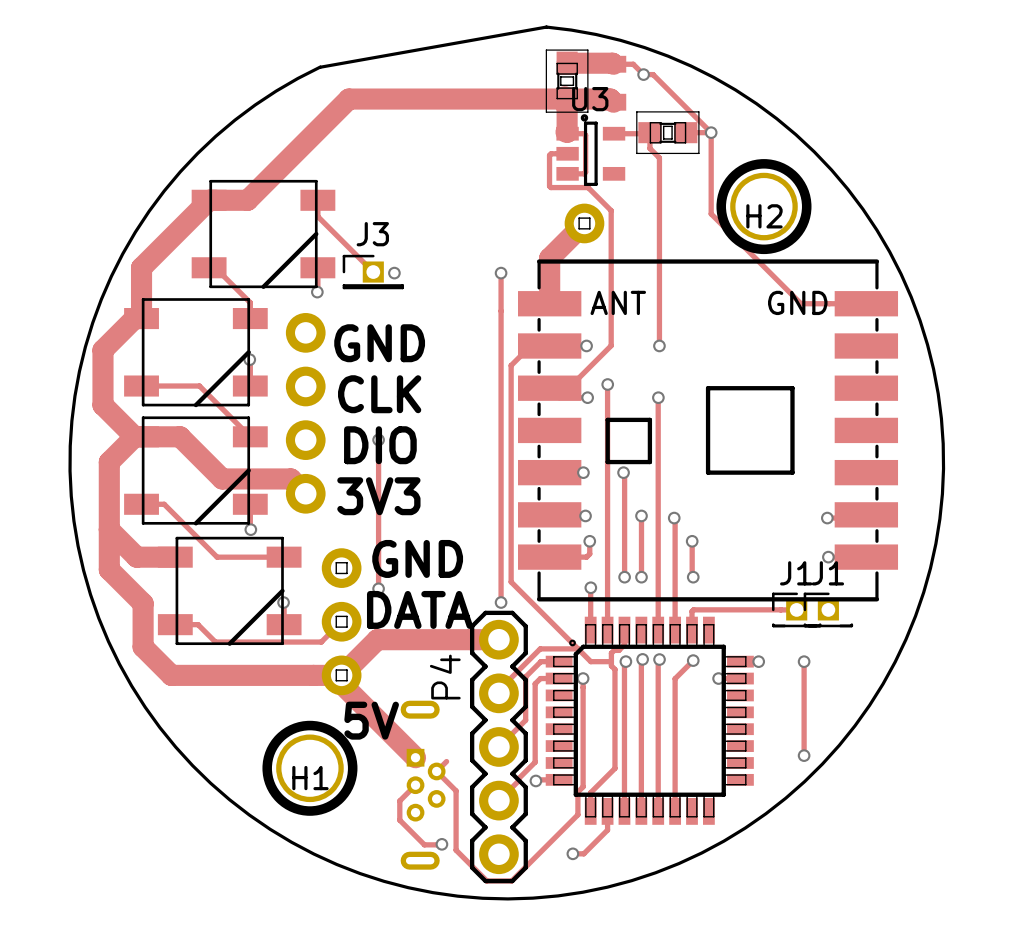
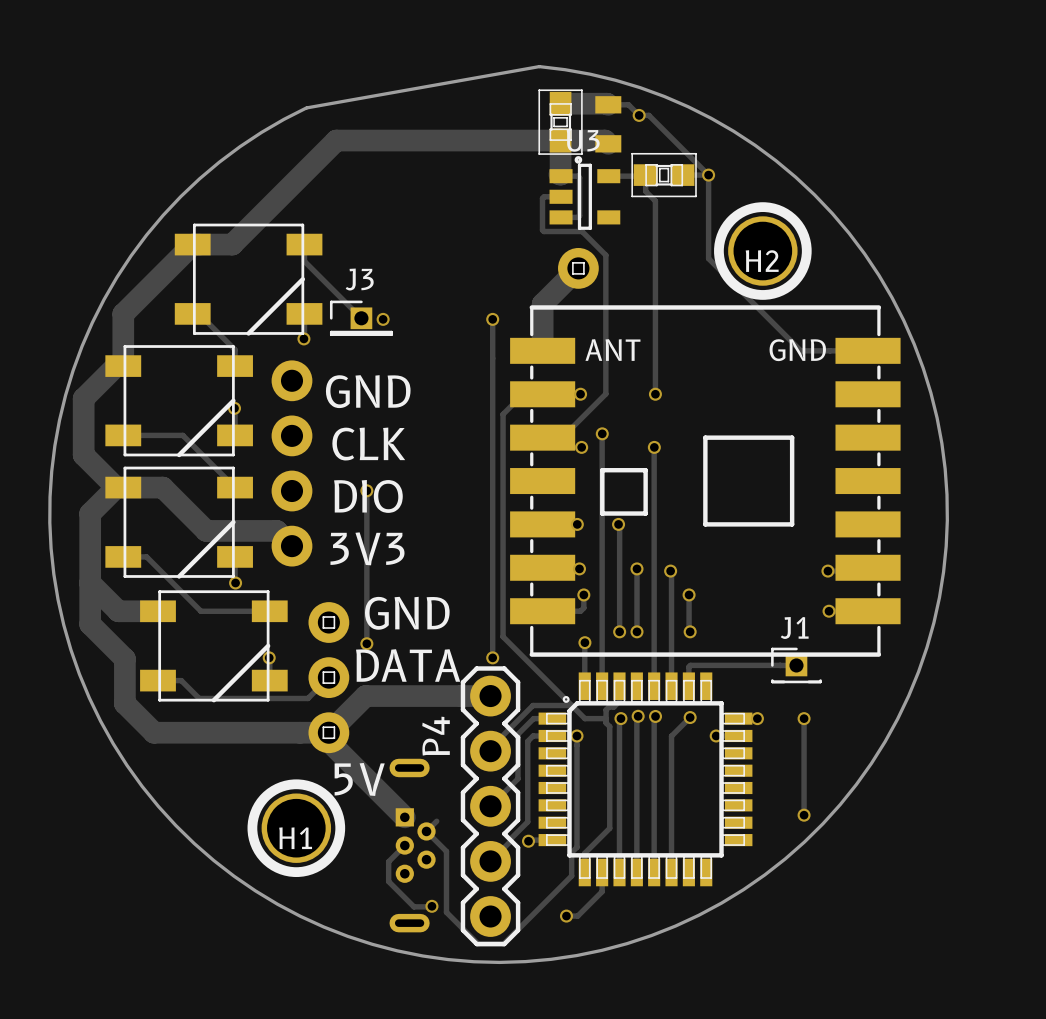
J1: (828, 609) -> none

